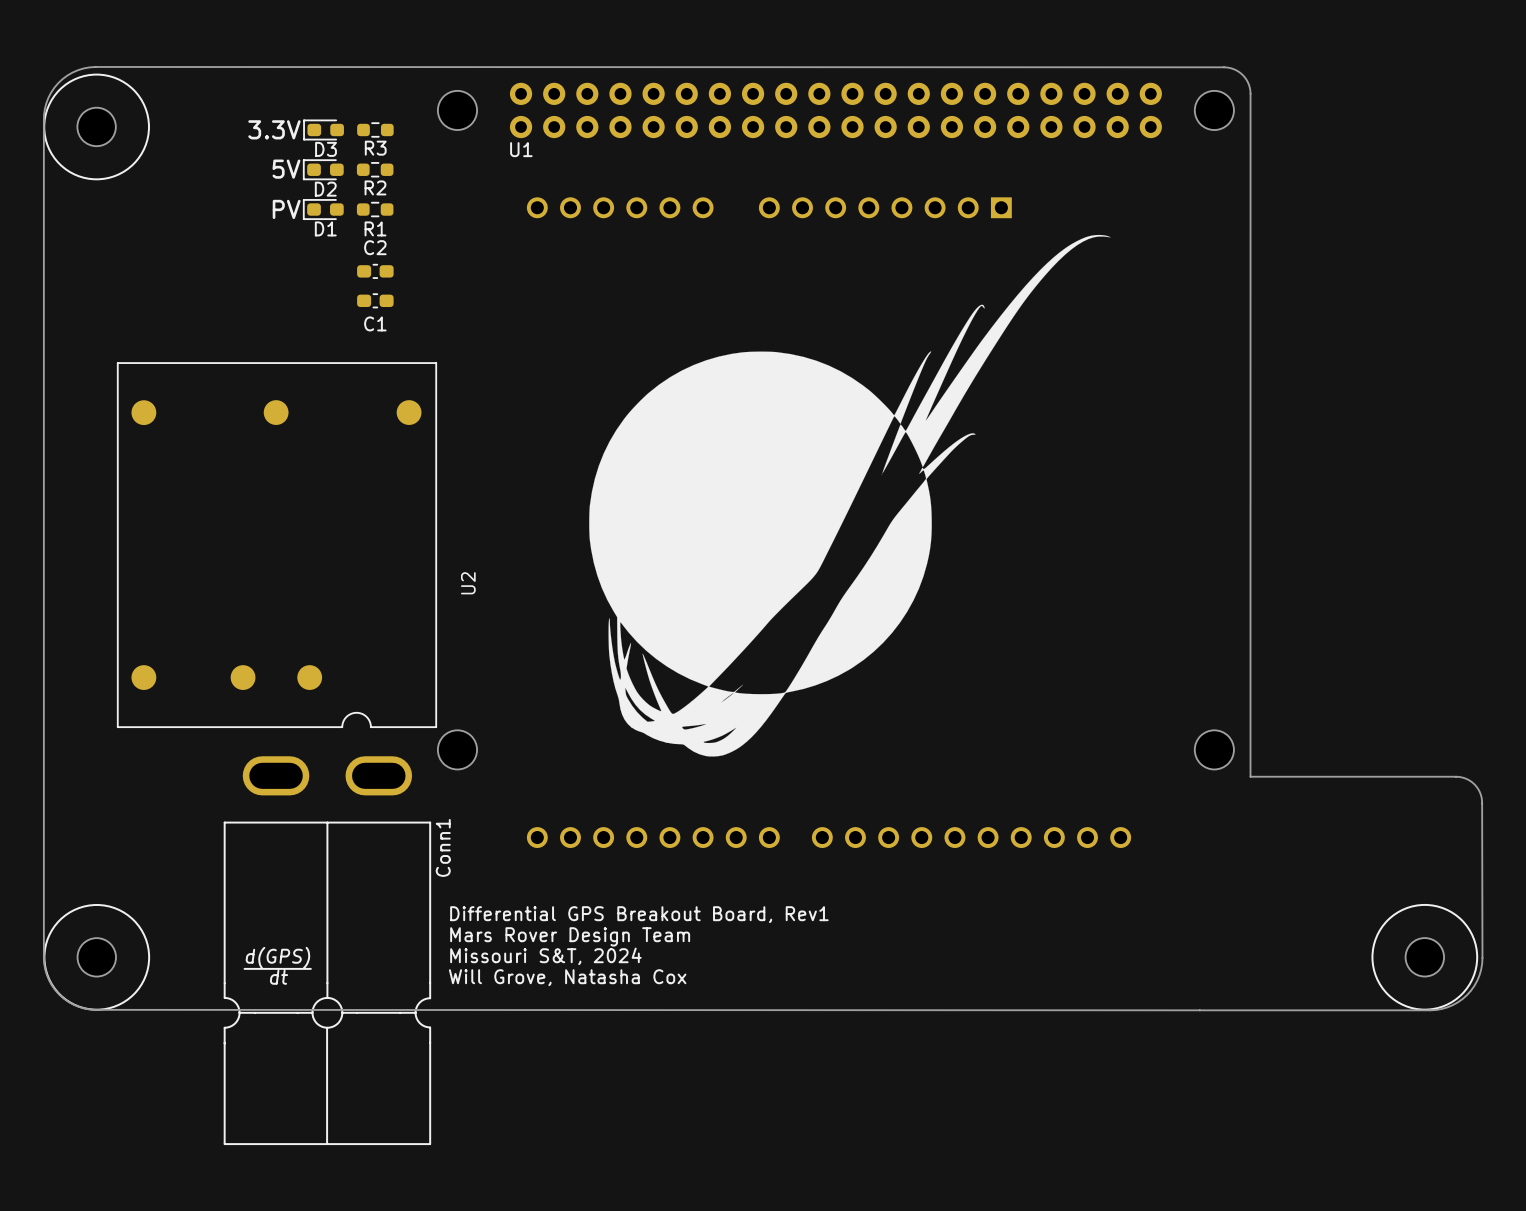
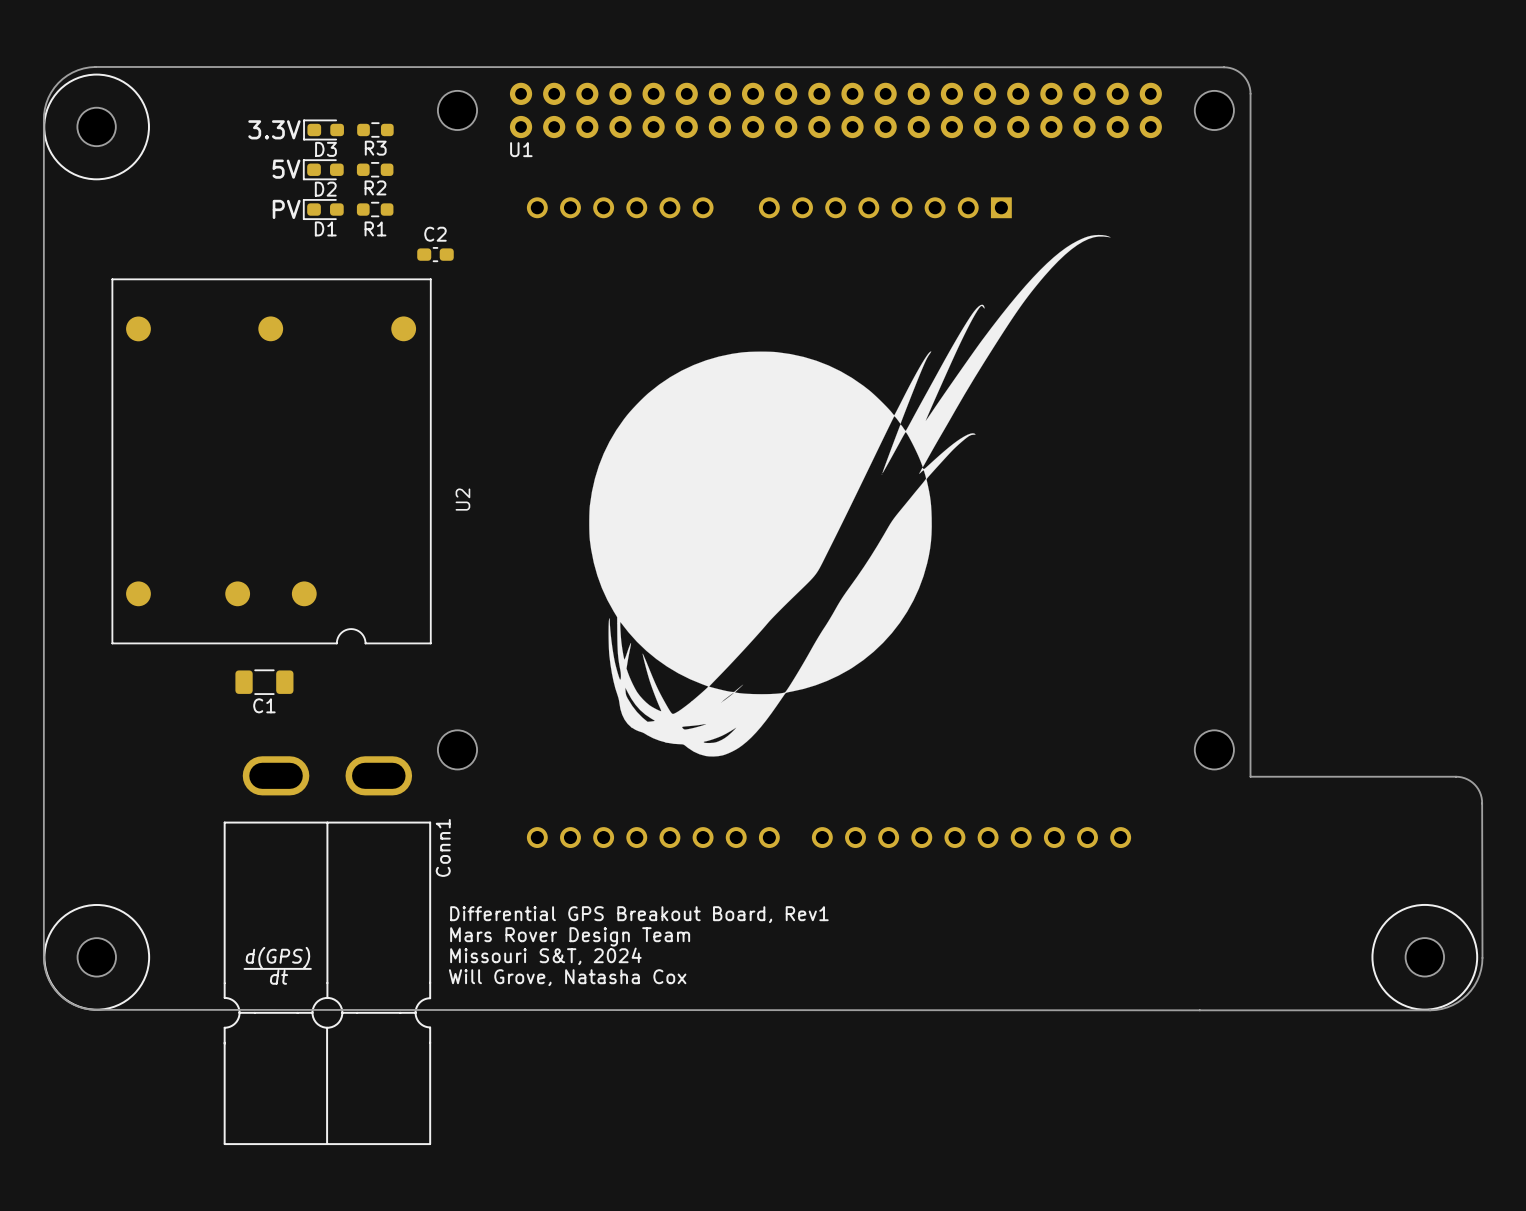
C2 name position: C2 (375, 247) -> C2 (435, 234)
C1 footprint: [357, 263, 394, 279] -> [235, 669, 294, 695]
C2 position: (375, 300) -> (435, 254)
C1 name position: C1 (375, 323) -> C1 (264, 705)
U2 position: (276, 545) -> (271, 461)

